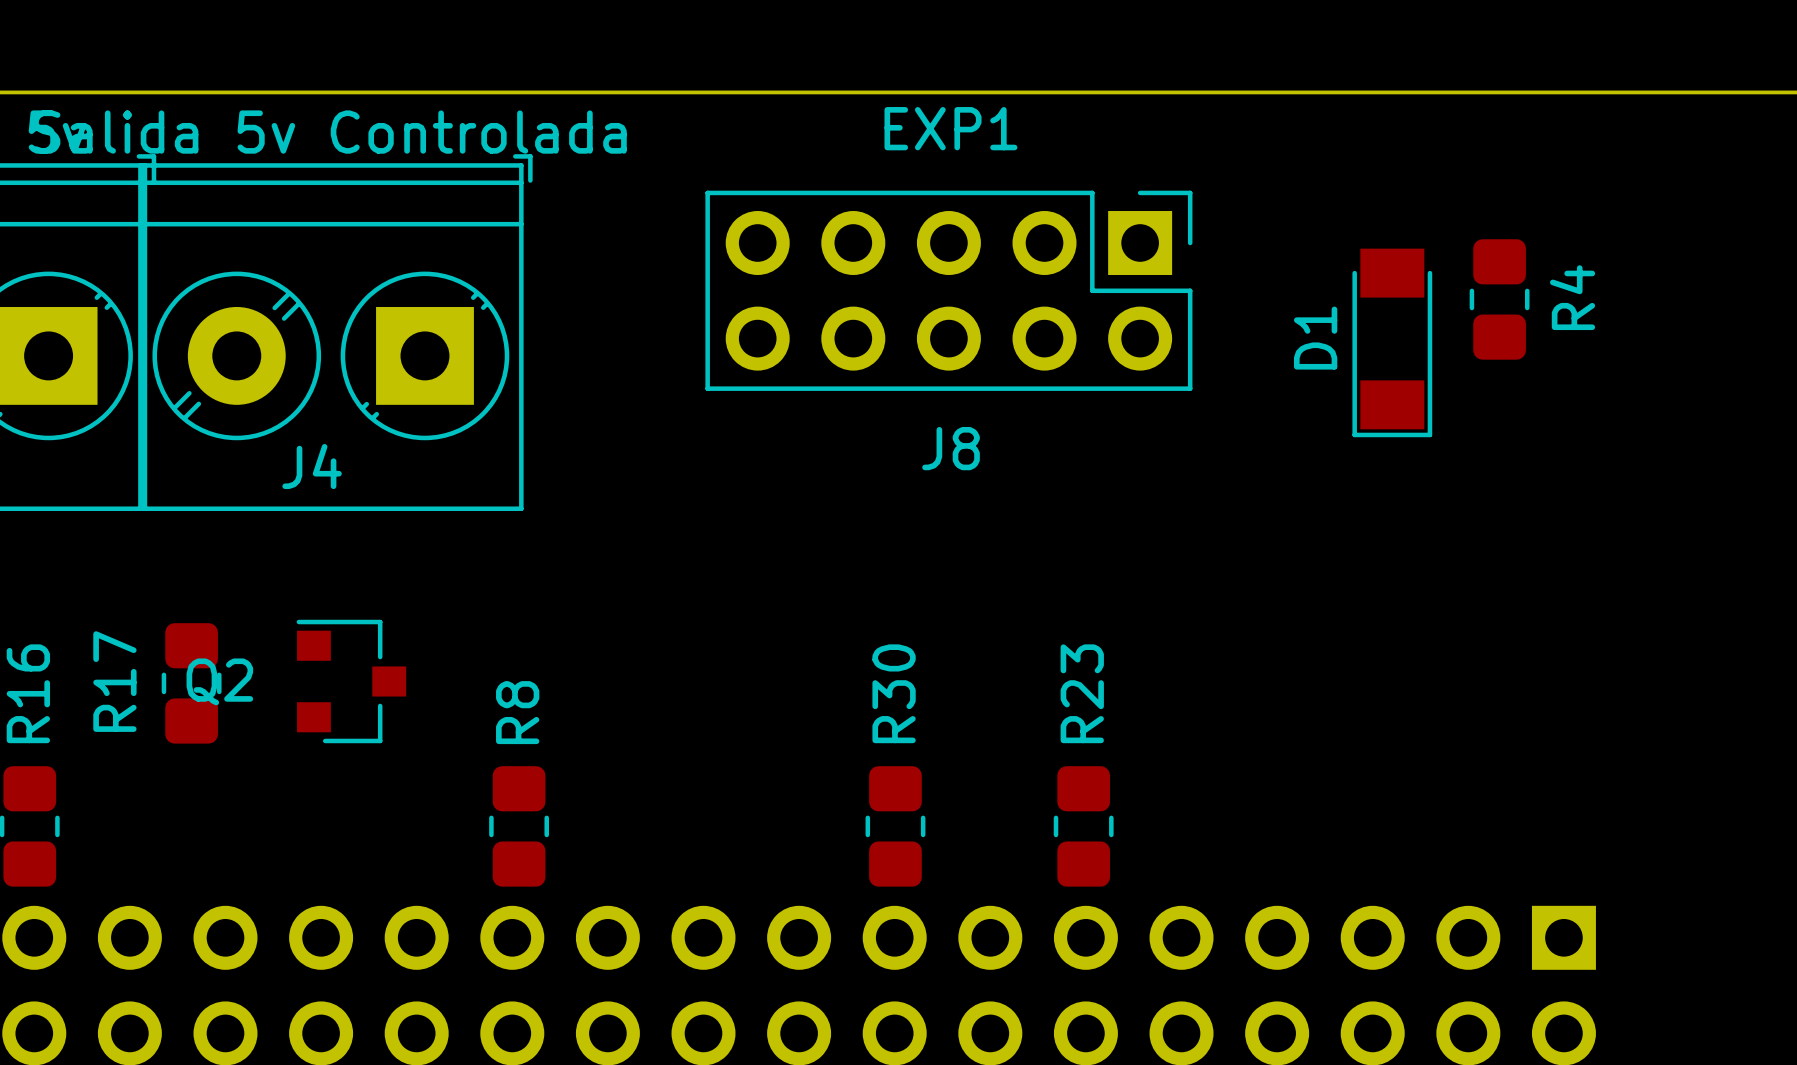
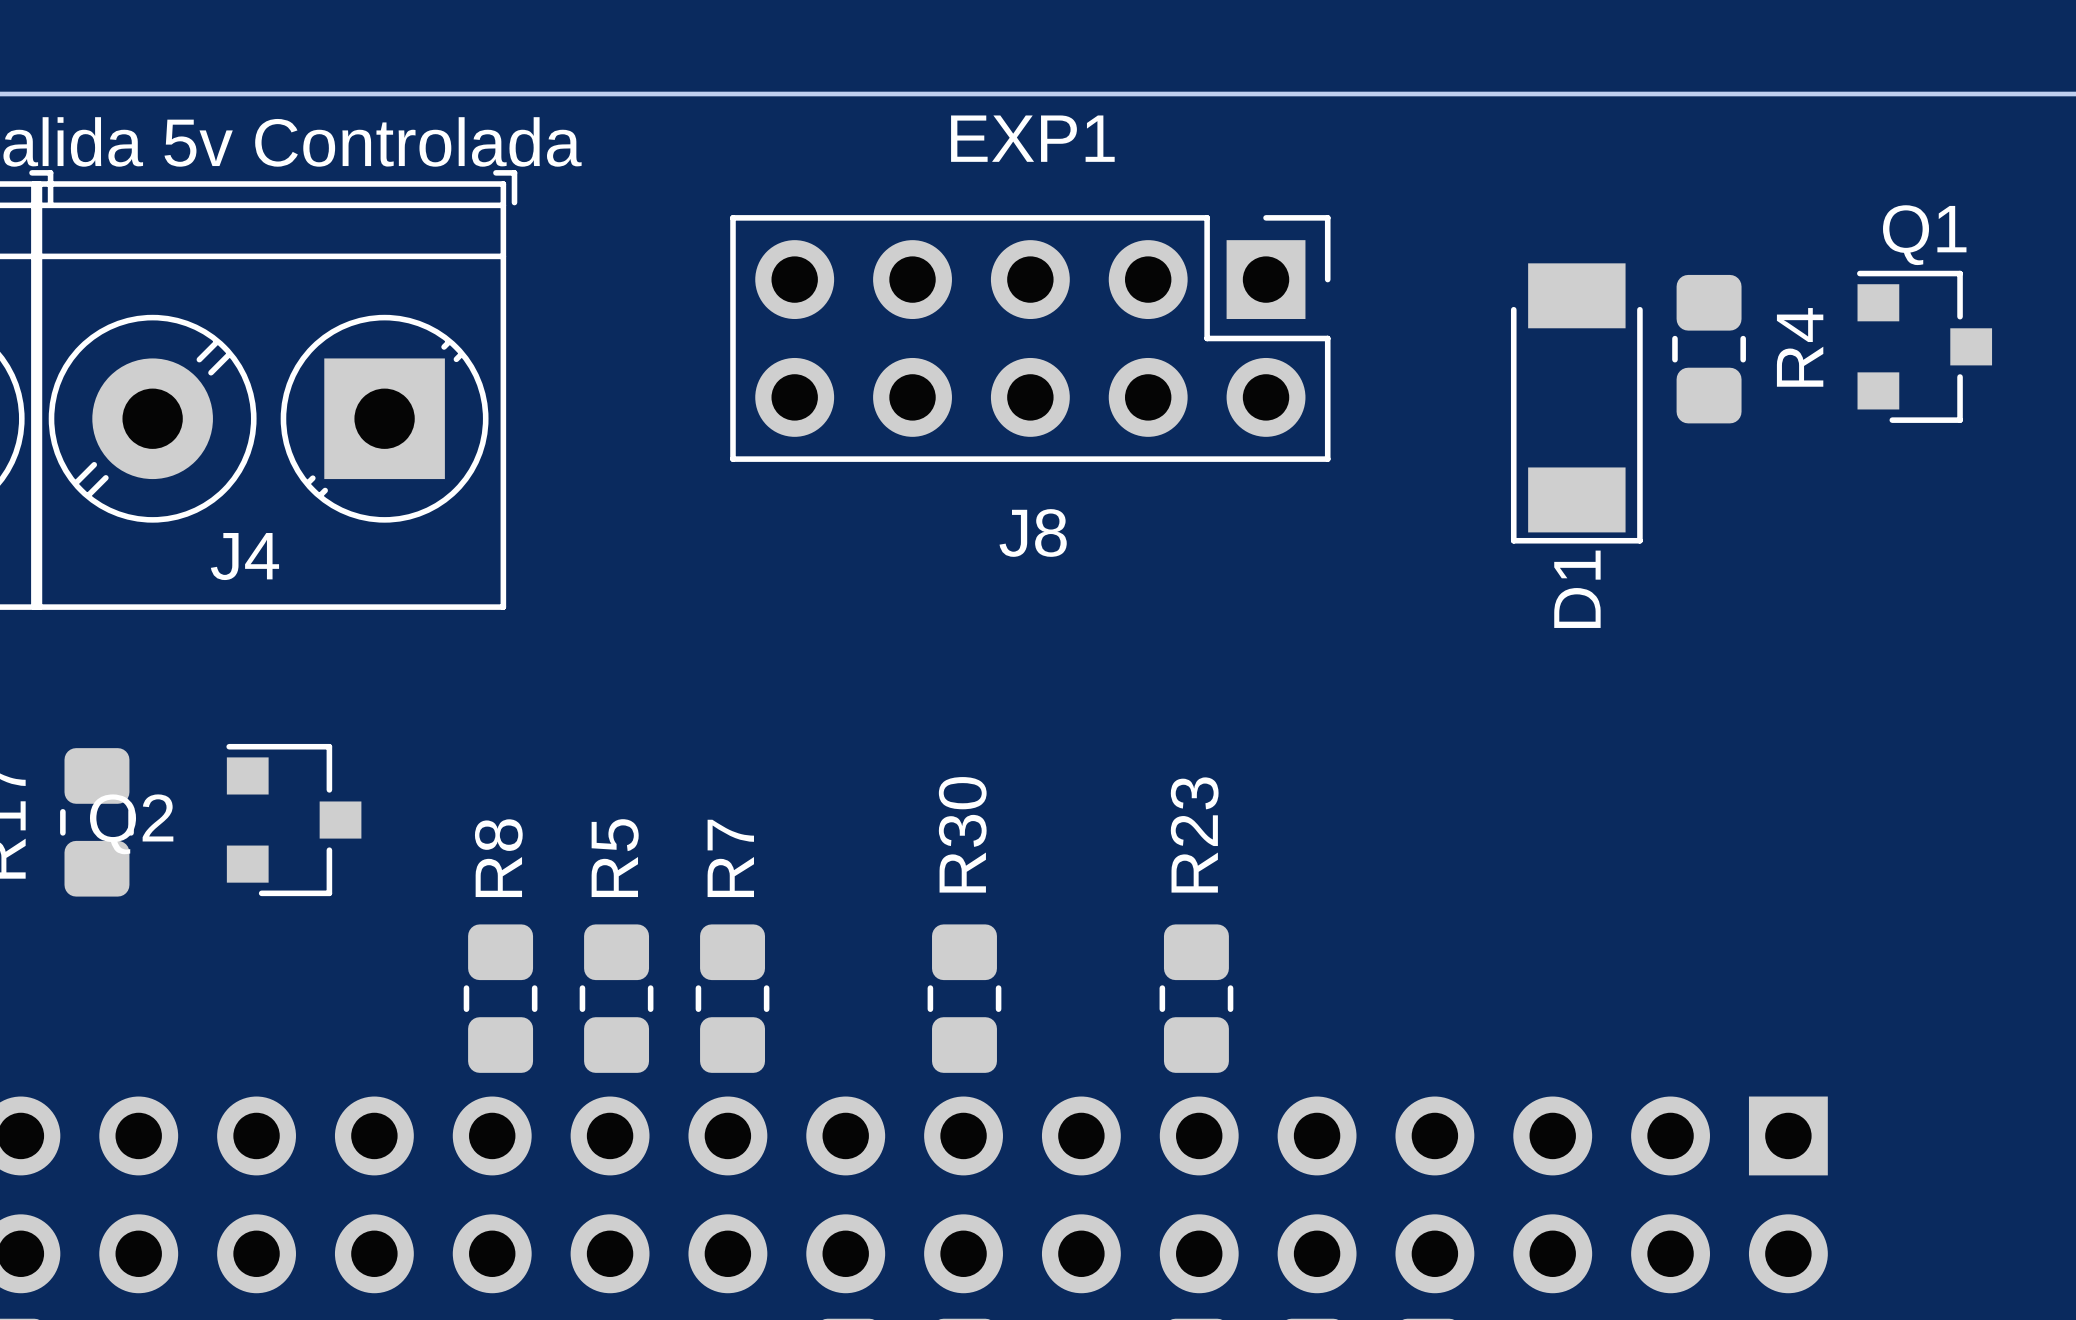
D1 footprint: [1352, 248, 1433, 438] -> [1510, 263, 1643, 544]
Q1: none -> (1924, 346)
D1 name position: D1 (1315, 338) -> D1 (1577, 589)
R5: none -> (616, 998)
R7: none -> (732, 998)

